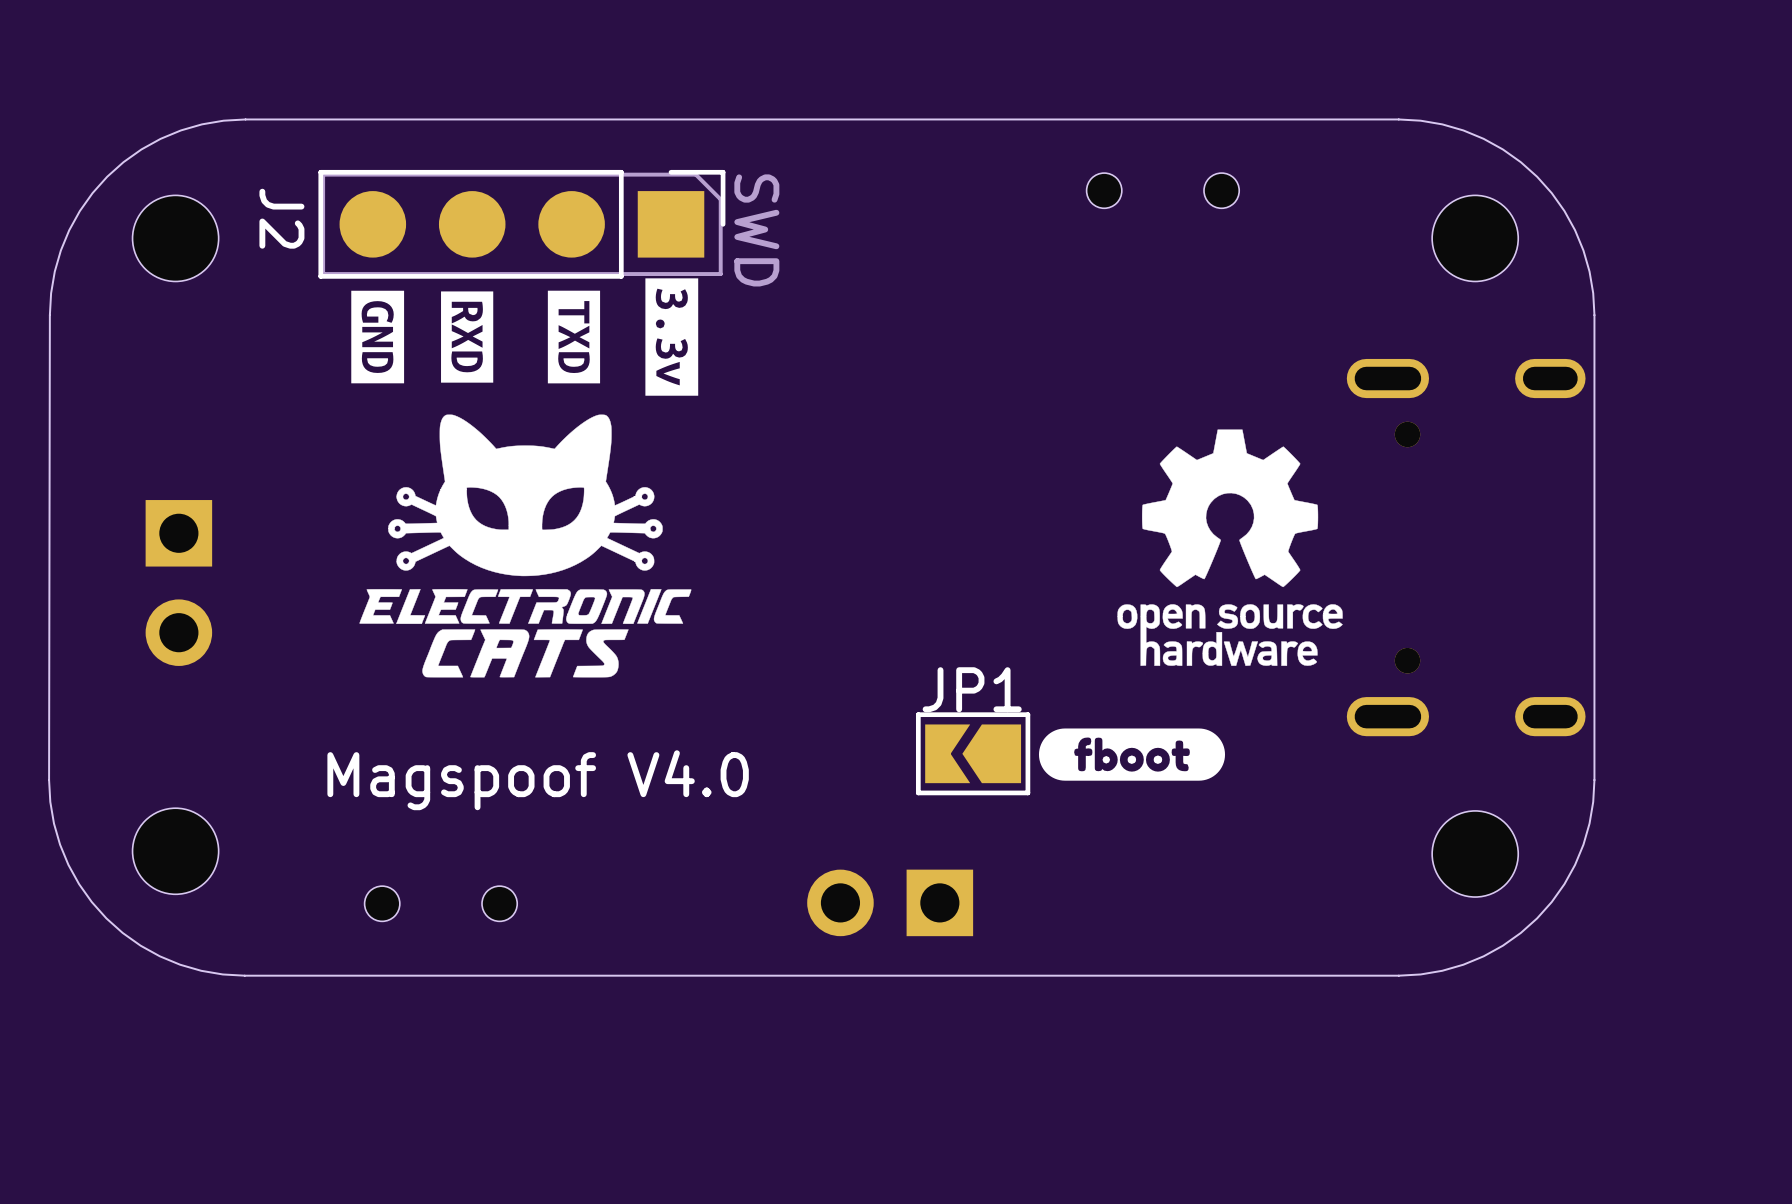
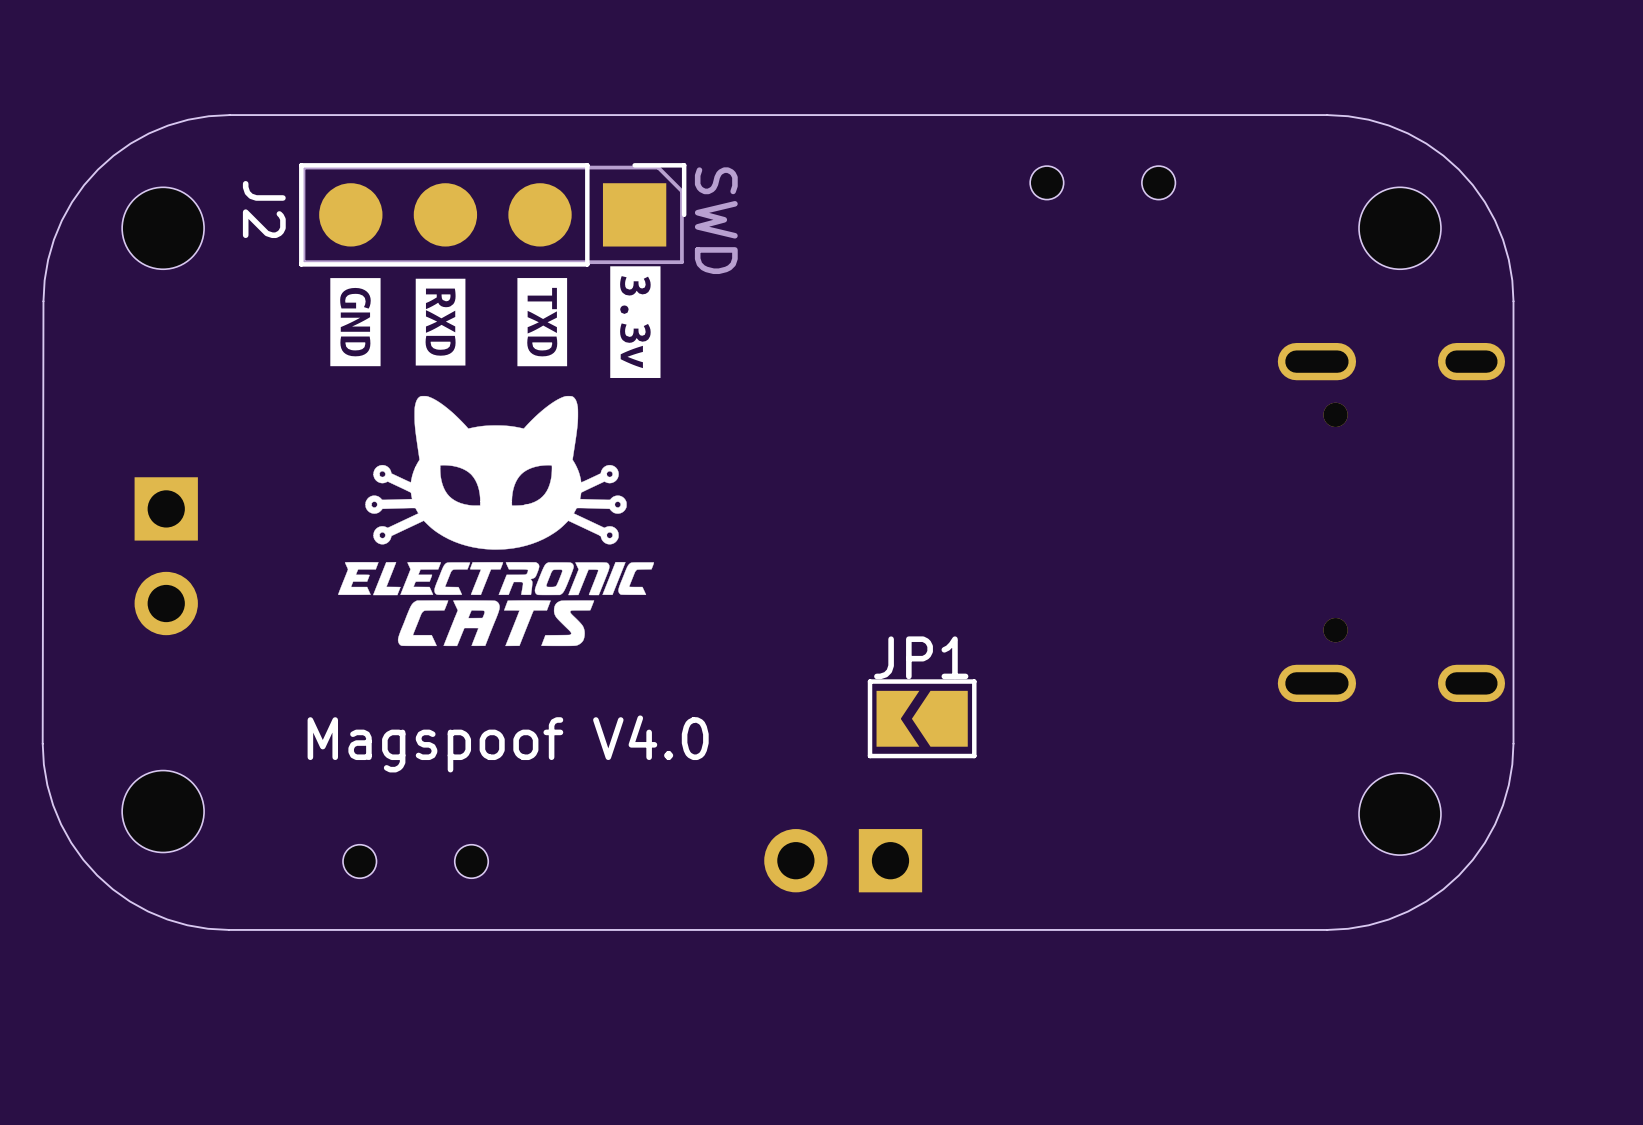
drawing: [1117, 429, 1343, 666] -> none
drawing: [1038, 728, 1226, 781] -> none

